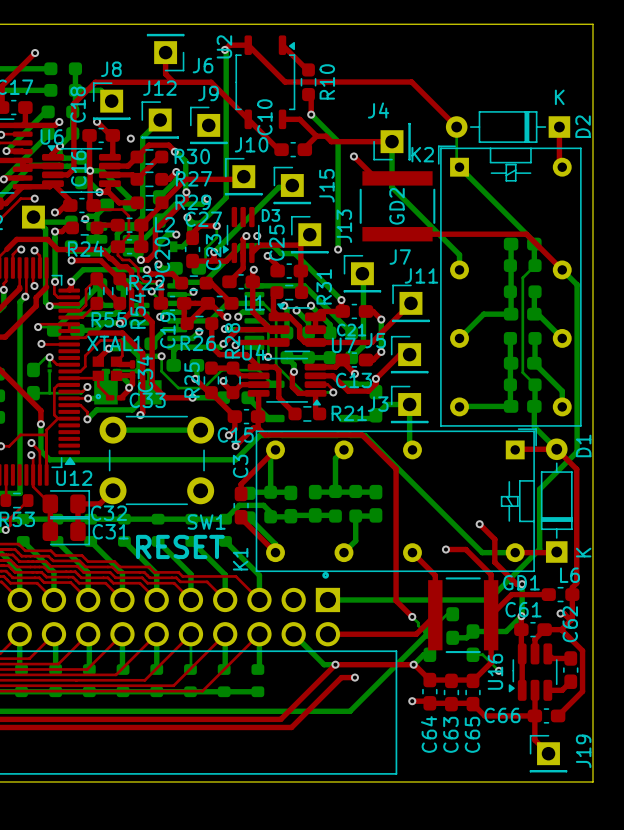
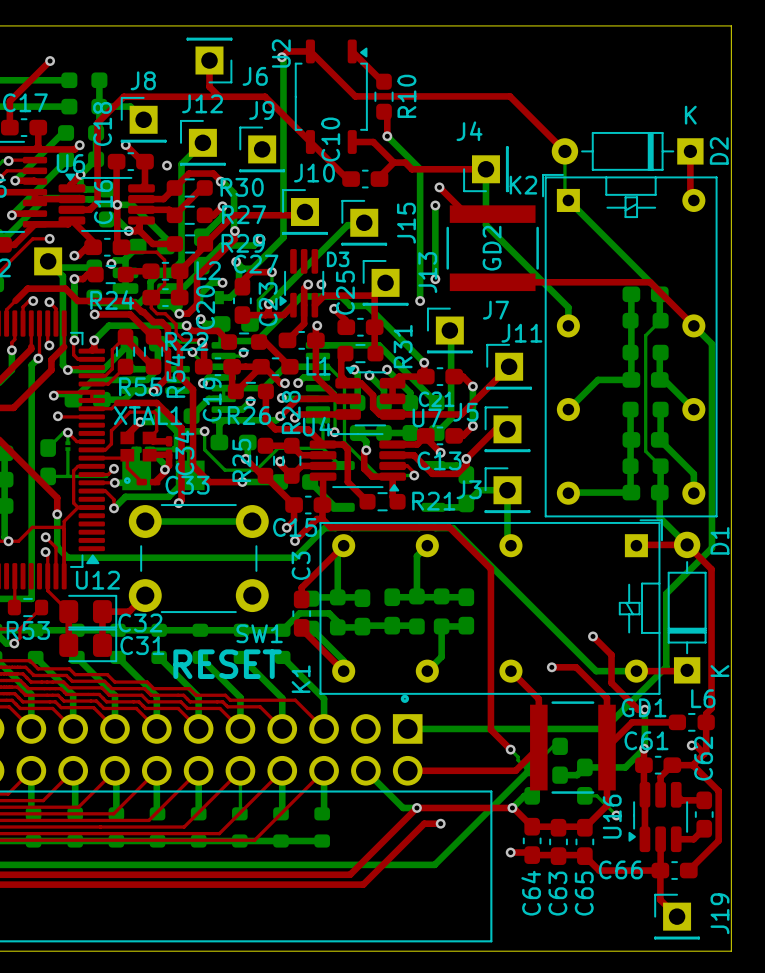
bottom track: none -> (435, 205) (435, 279)
via: none -> (435, 205)
via: none -> (435, 279)

